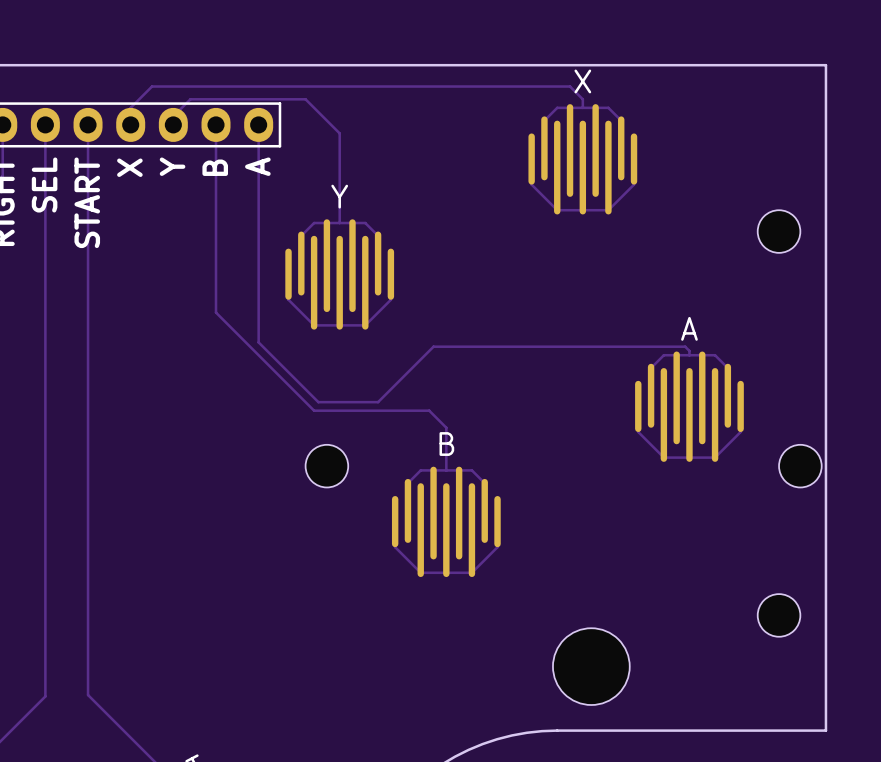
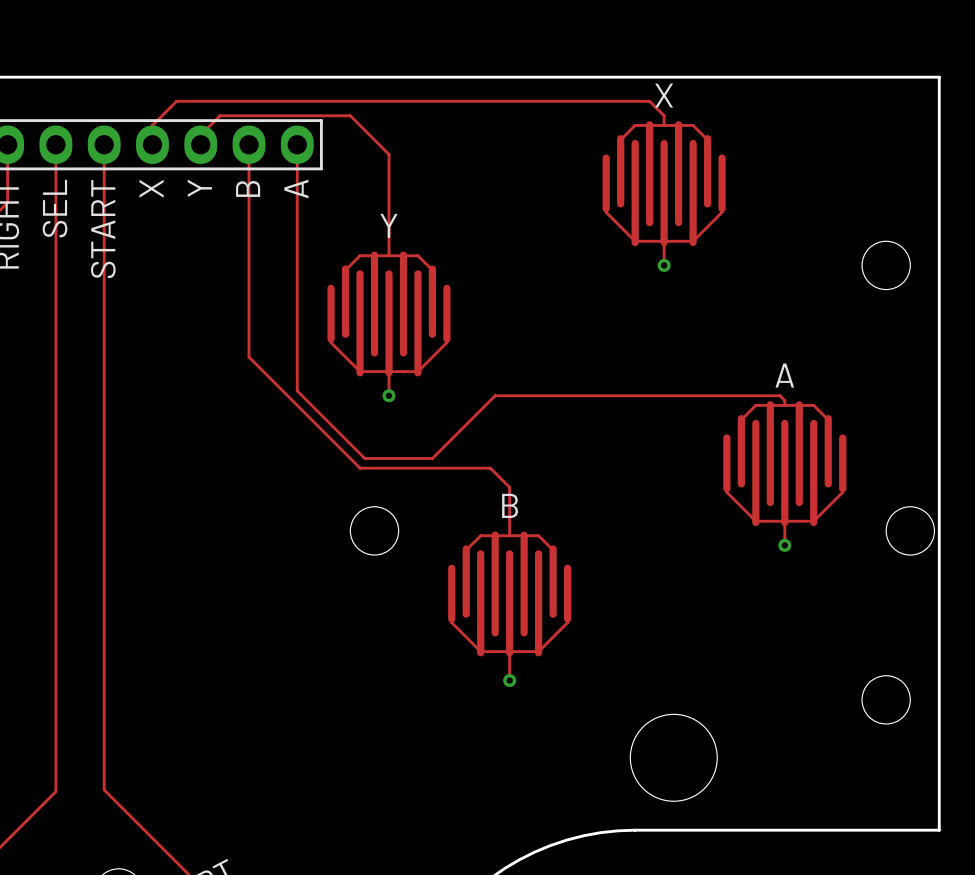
track: none -> (664, 241) (664, 265)
via: none -> (664, 265)
track: none -> (388, 371) (388, 395)
via: none -> (388, 395)
track: none -> (784, 521) (784, 545)
via: none -> (784, 545)
track: none -> (509, 651) (509, 680)
via: none -> (509, 680)

